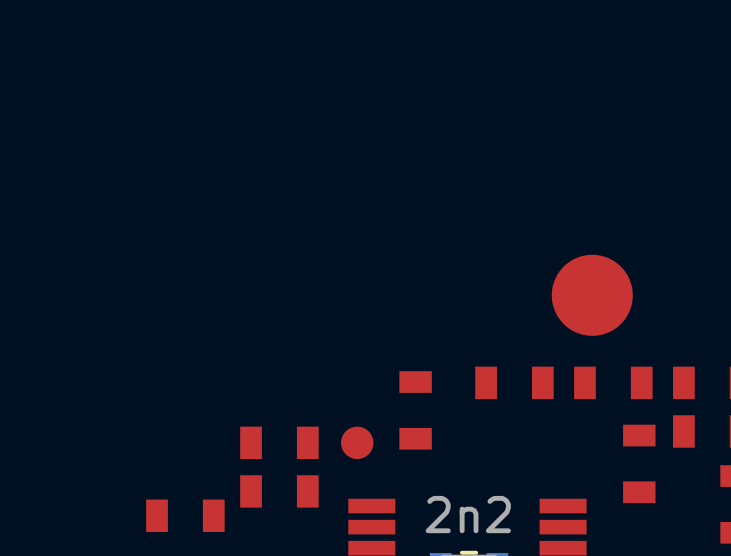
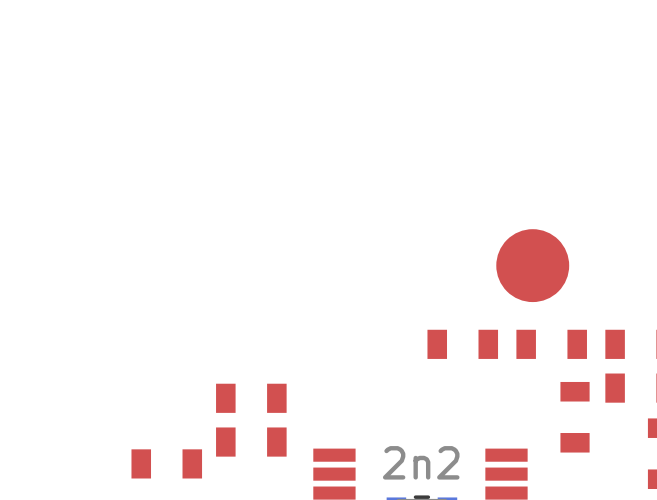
part: (415, 410) -> none
part: (357, 442) -> none

